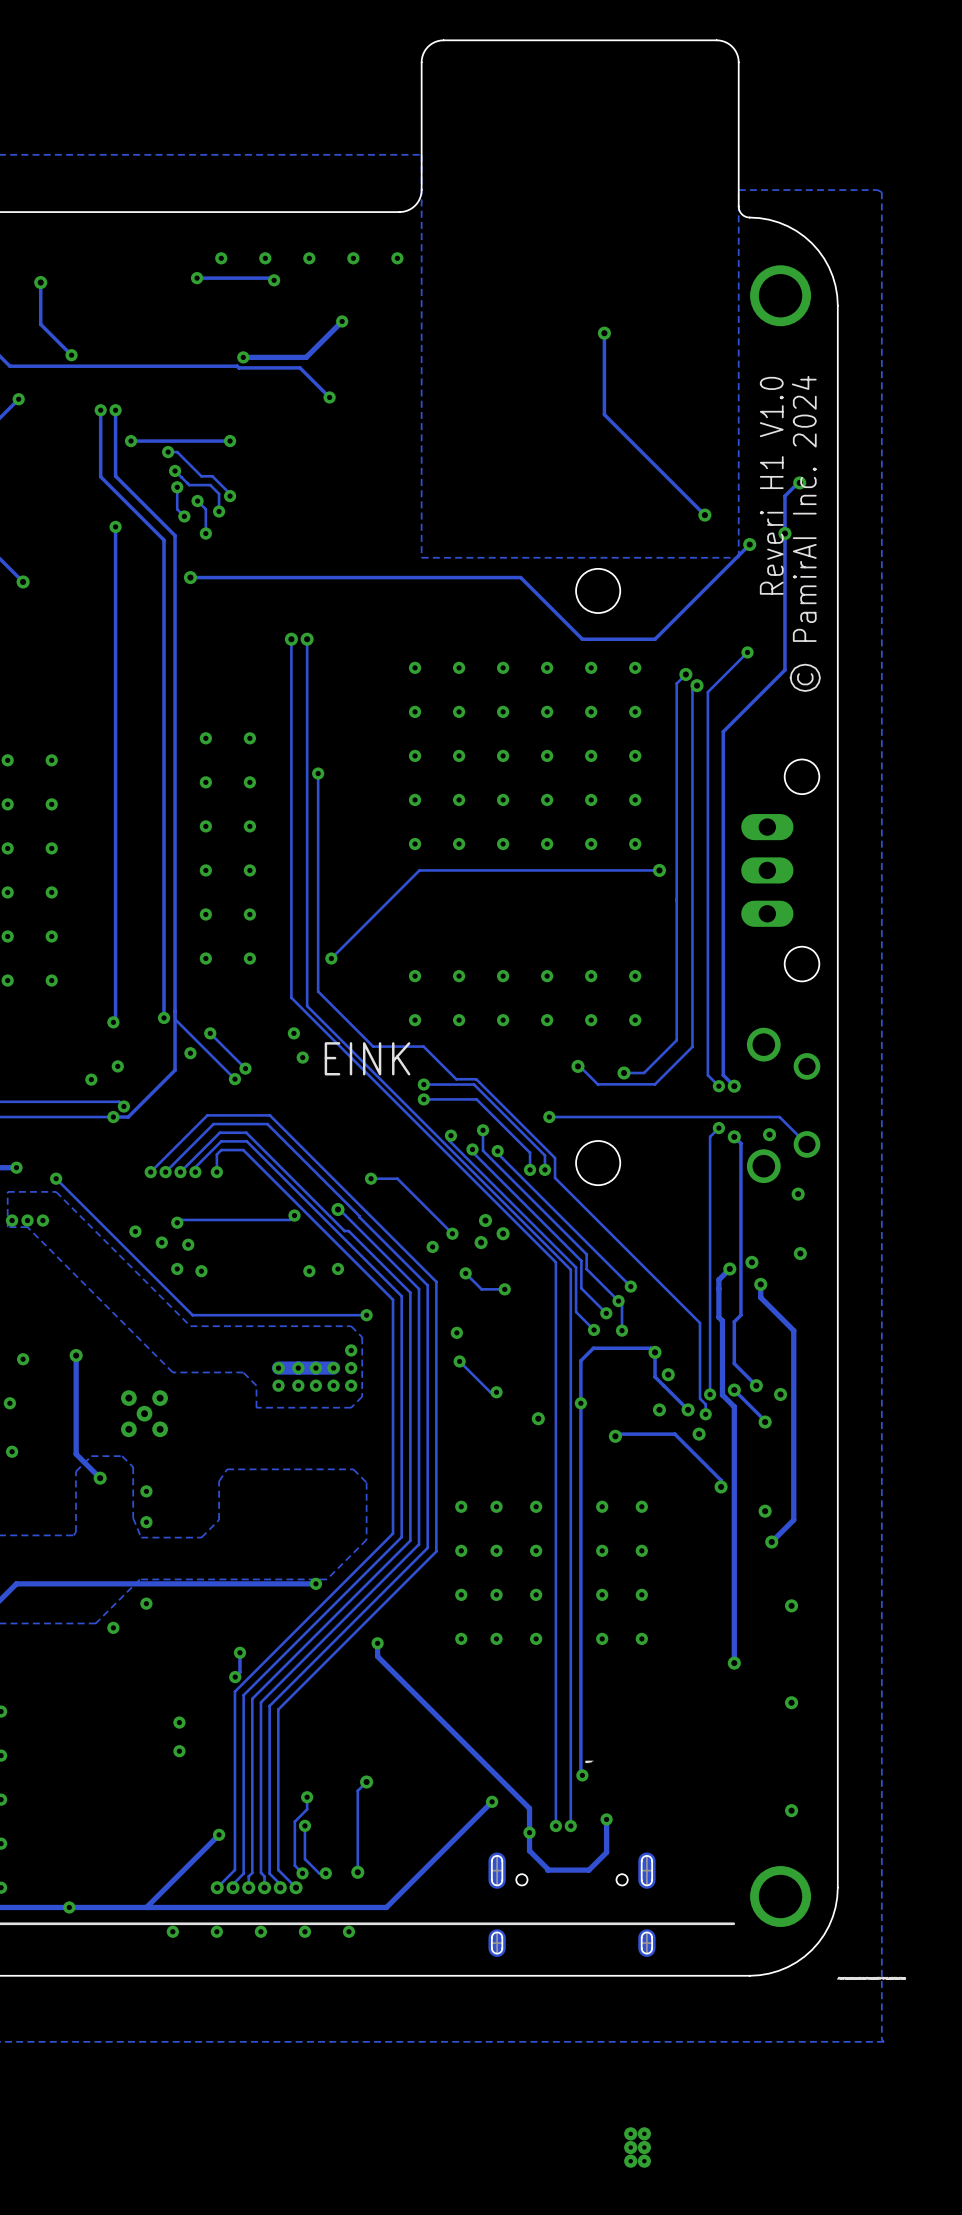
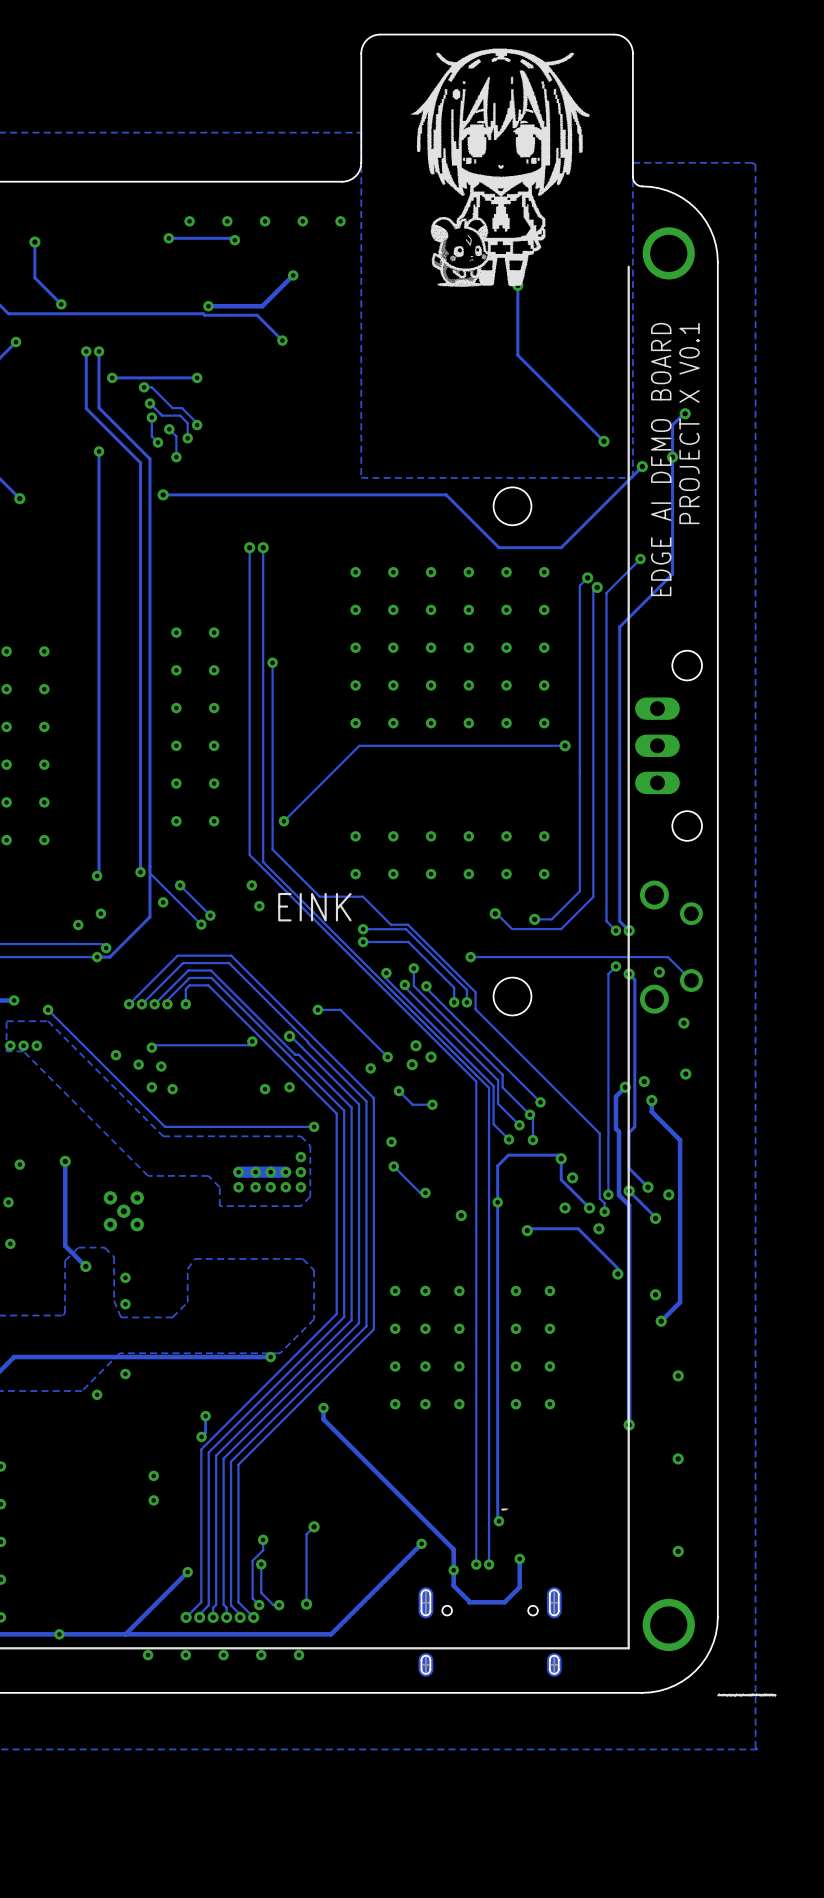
drawing: none -> [410, 48, 590, 287]
line: none -> (628, 266) (628, 1648)
text: Reveri H1 V1.0 (771, 485) -> EDGE AI DEMO BOARD (661, 459)
text: © PamirAI Inc. 2024 (805, 533) -> PROJECT X V0.1 (689, 423)
part: (637, 2147) -> none

